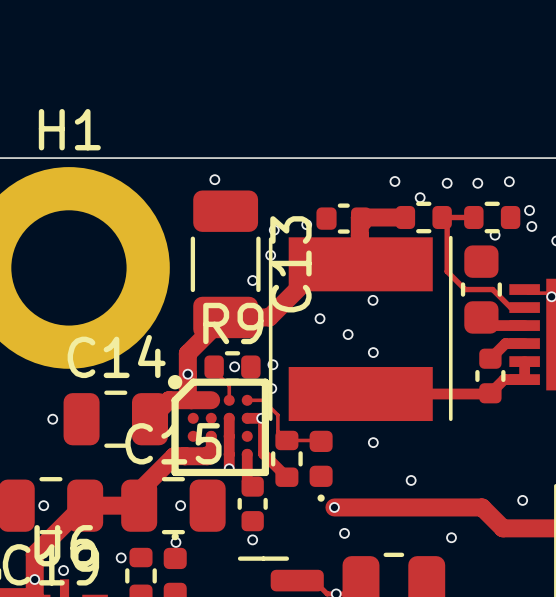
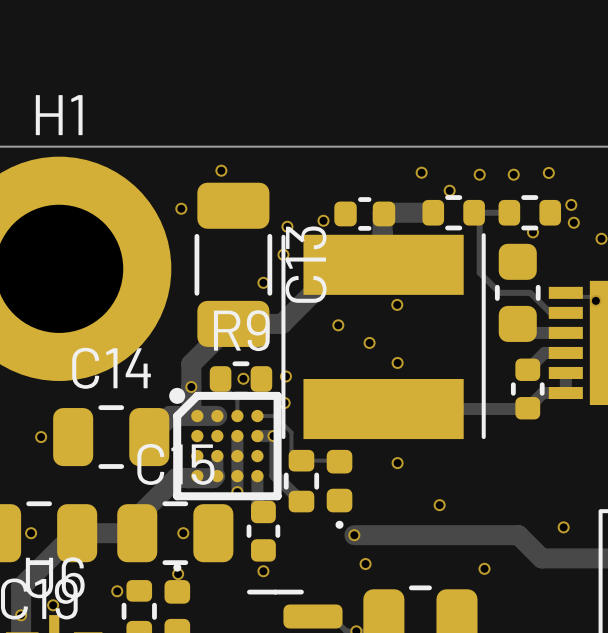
via: none -> (181, 208)

